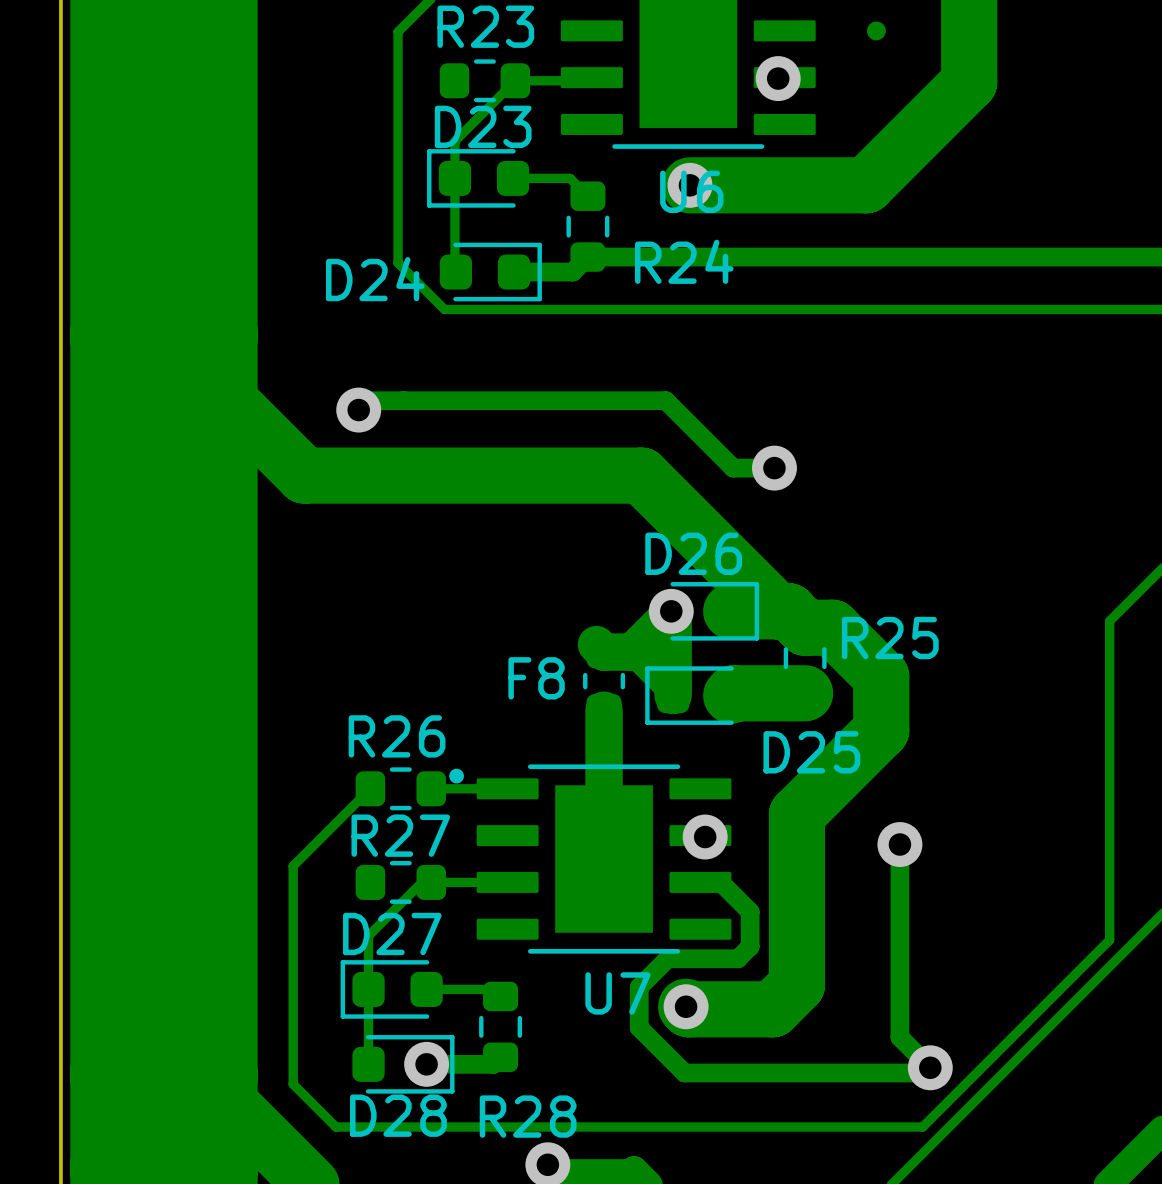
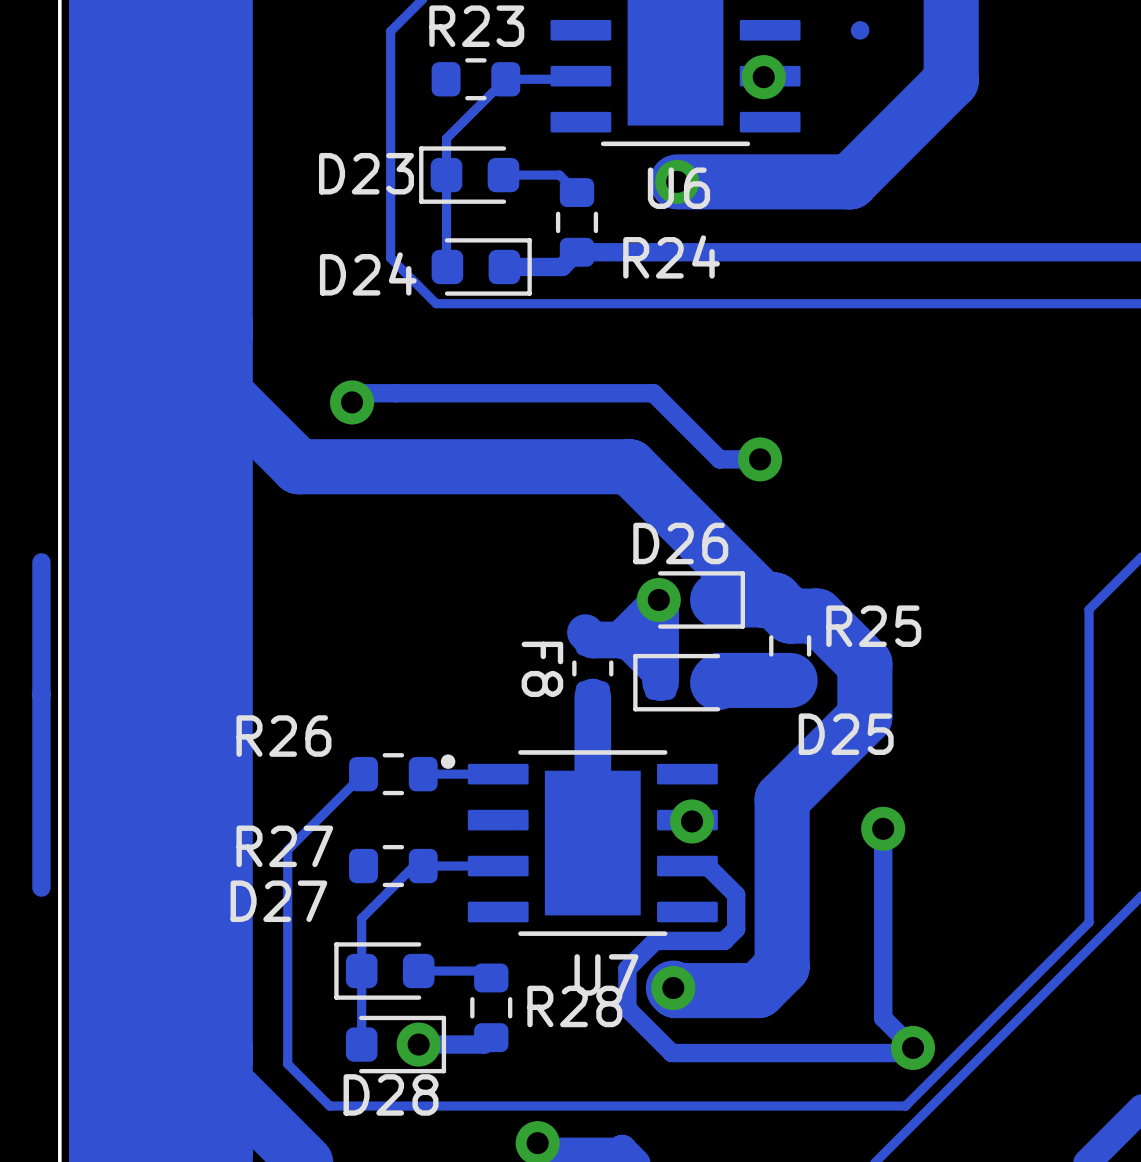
D23 name position: D23 (483, 126) -> D23 (366, 173)
track: none -> (41, 562) (41, 887)
F8 name rotation: 0° (536, 678) -> 90° clockwise (542, 669)
R26 name position: R26 (397, 736) -> R26 (283, 736)
D25 name position: D25 (811, 752) -> D25 (846, 734)
R27 name position: R27 (400, 835) -> R27 (284, 846)
D27 name position: D27 (392, 933) -> D27 (278, 901)
R28 name position: R28 (528, 1116) -> R28 (574, 1006)

